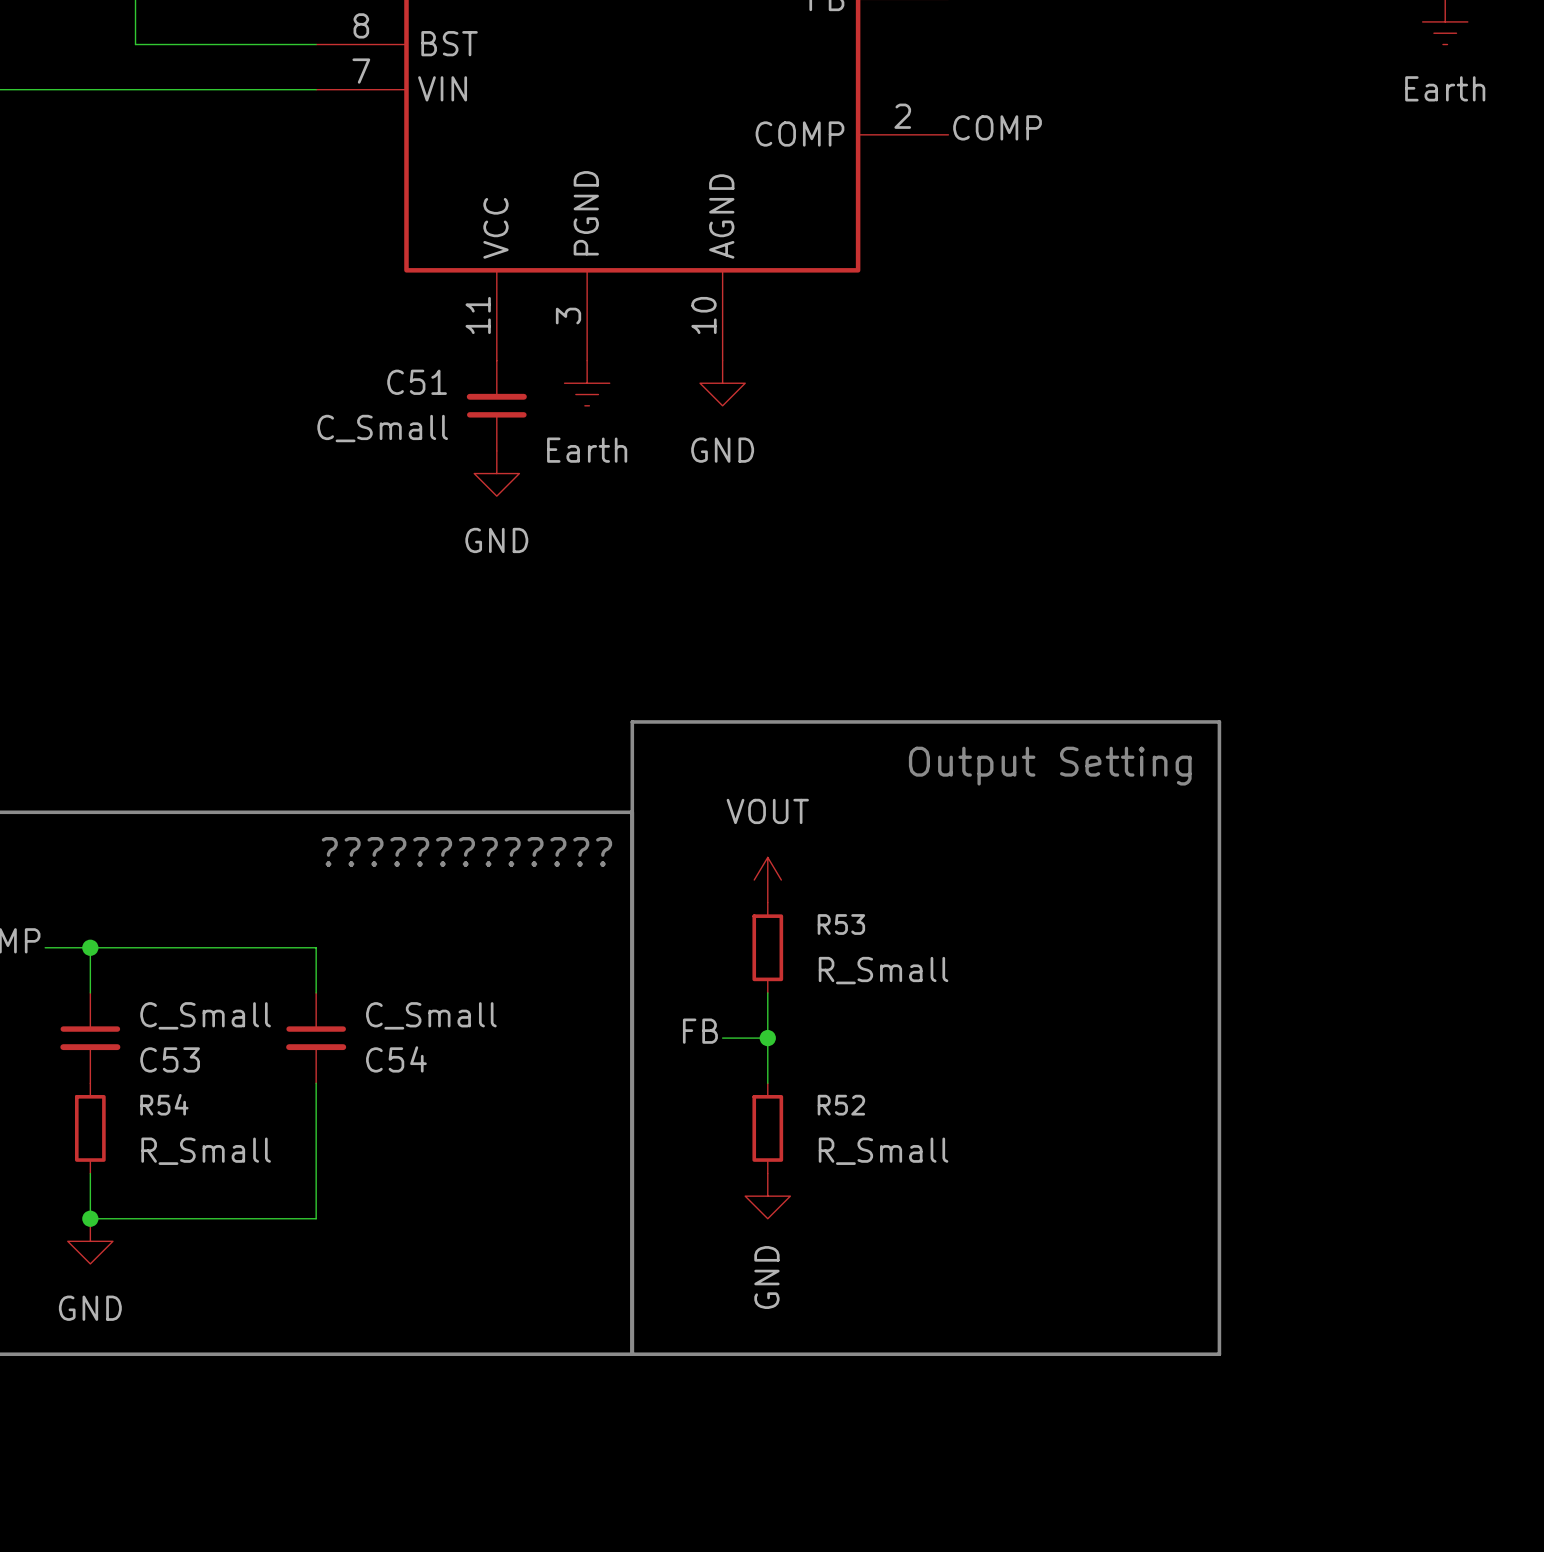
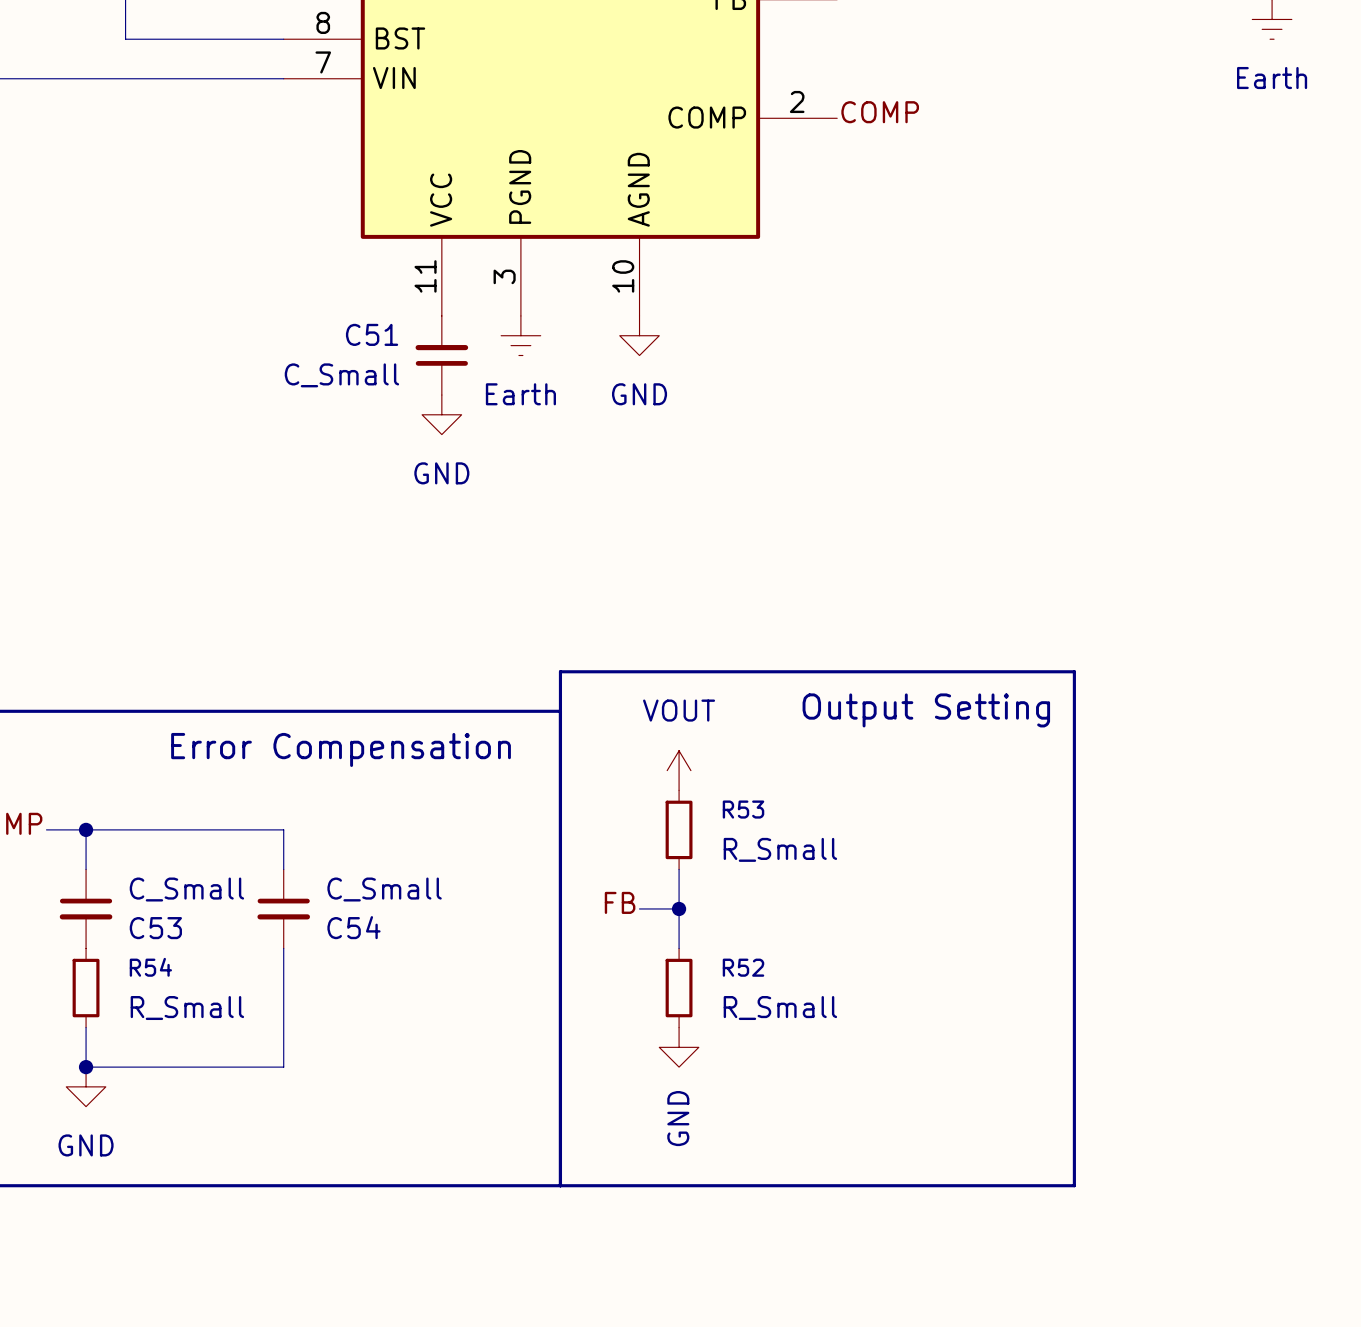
text position: Output Setting (1050, 766) -> Output Setting (926, 710)
line: (632, 767) (632, 721) (1219, 721) (1219, 767) -> (560, 671) (1074, 671)
text: ????????????? (466, 852) -> none
text: none -> Error Compensation (341, 749)

